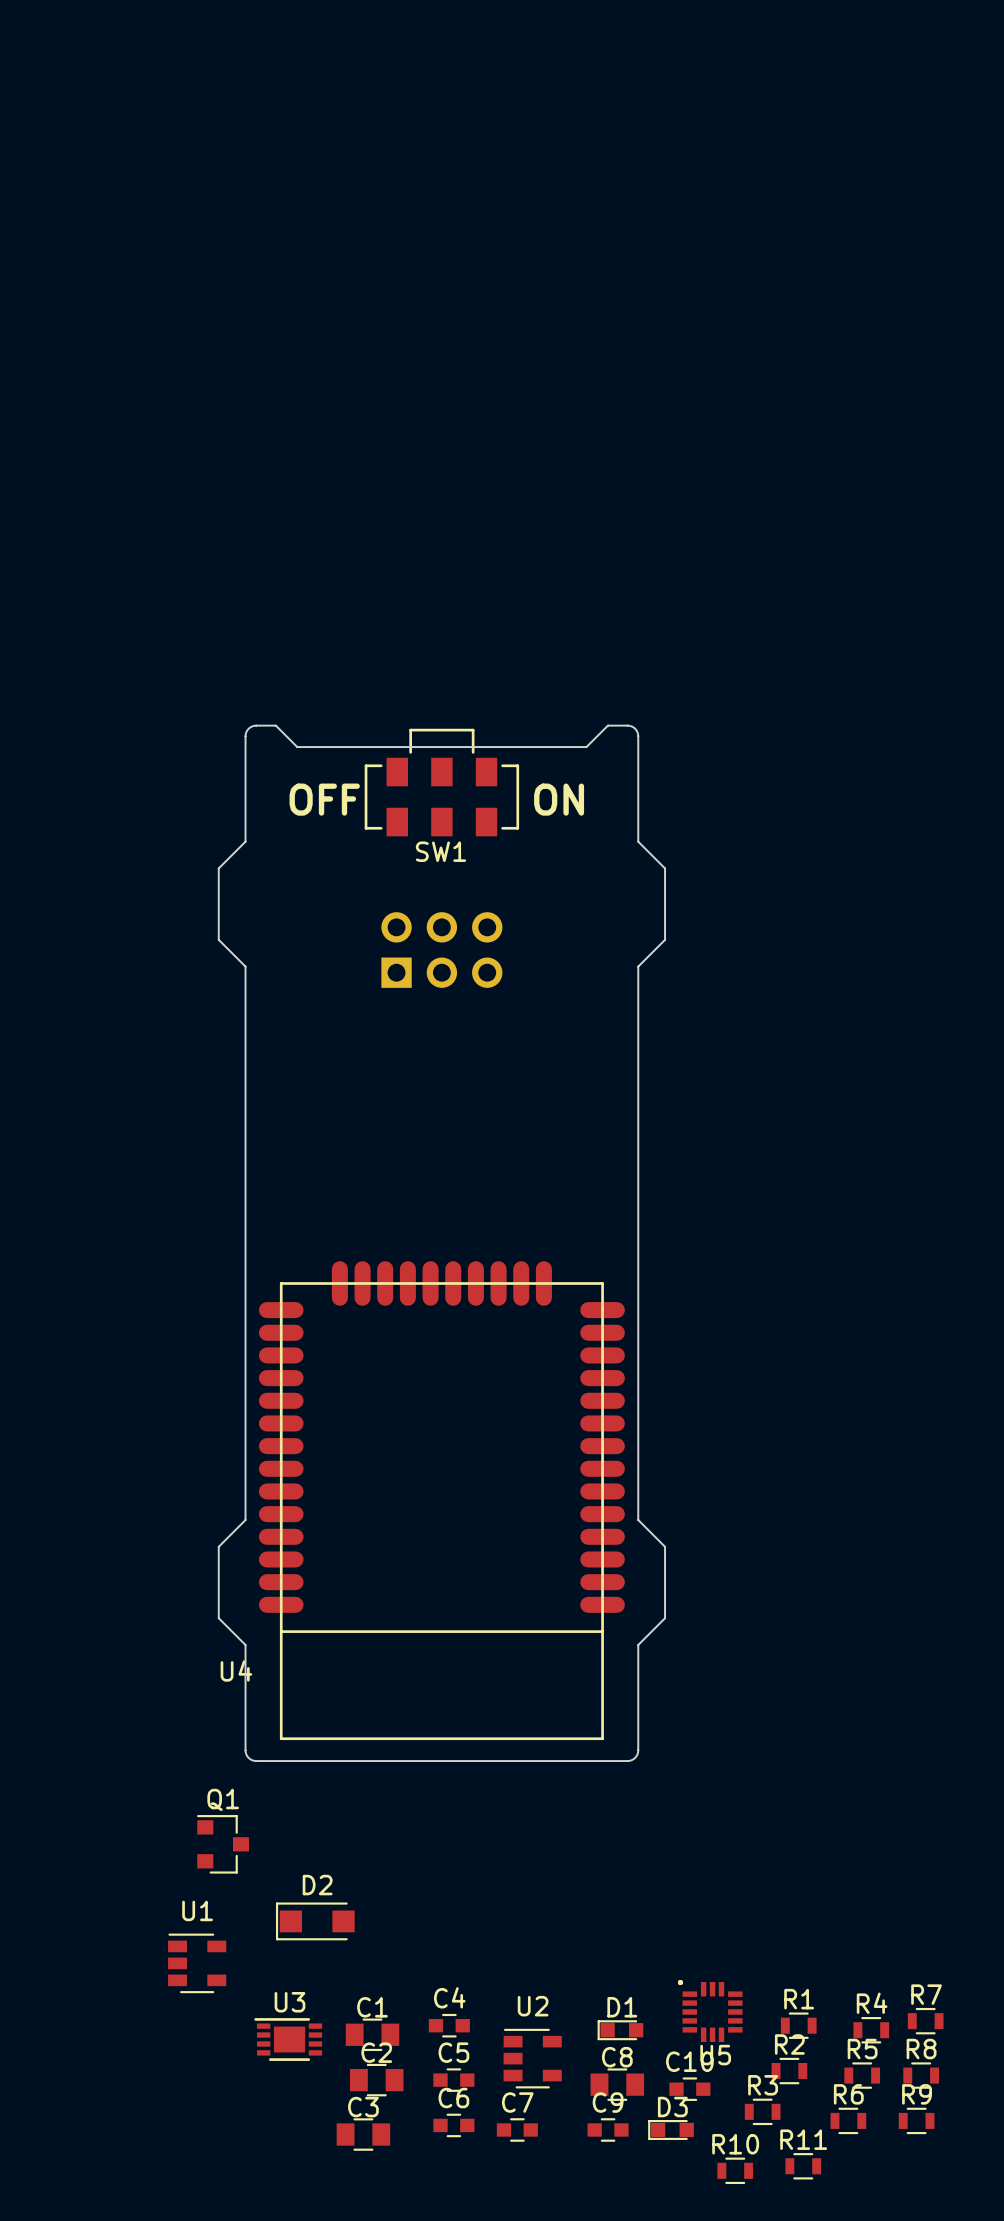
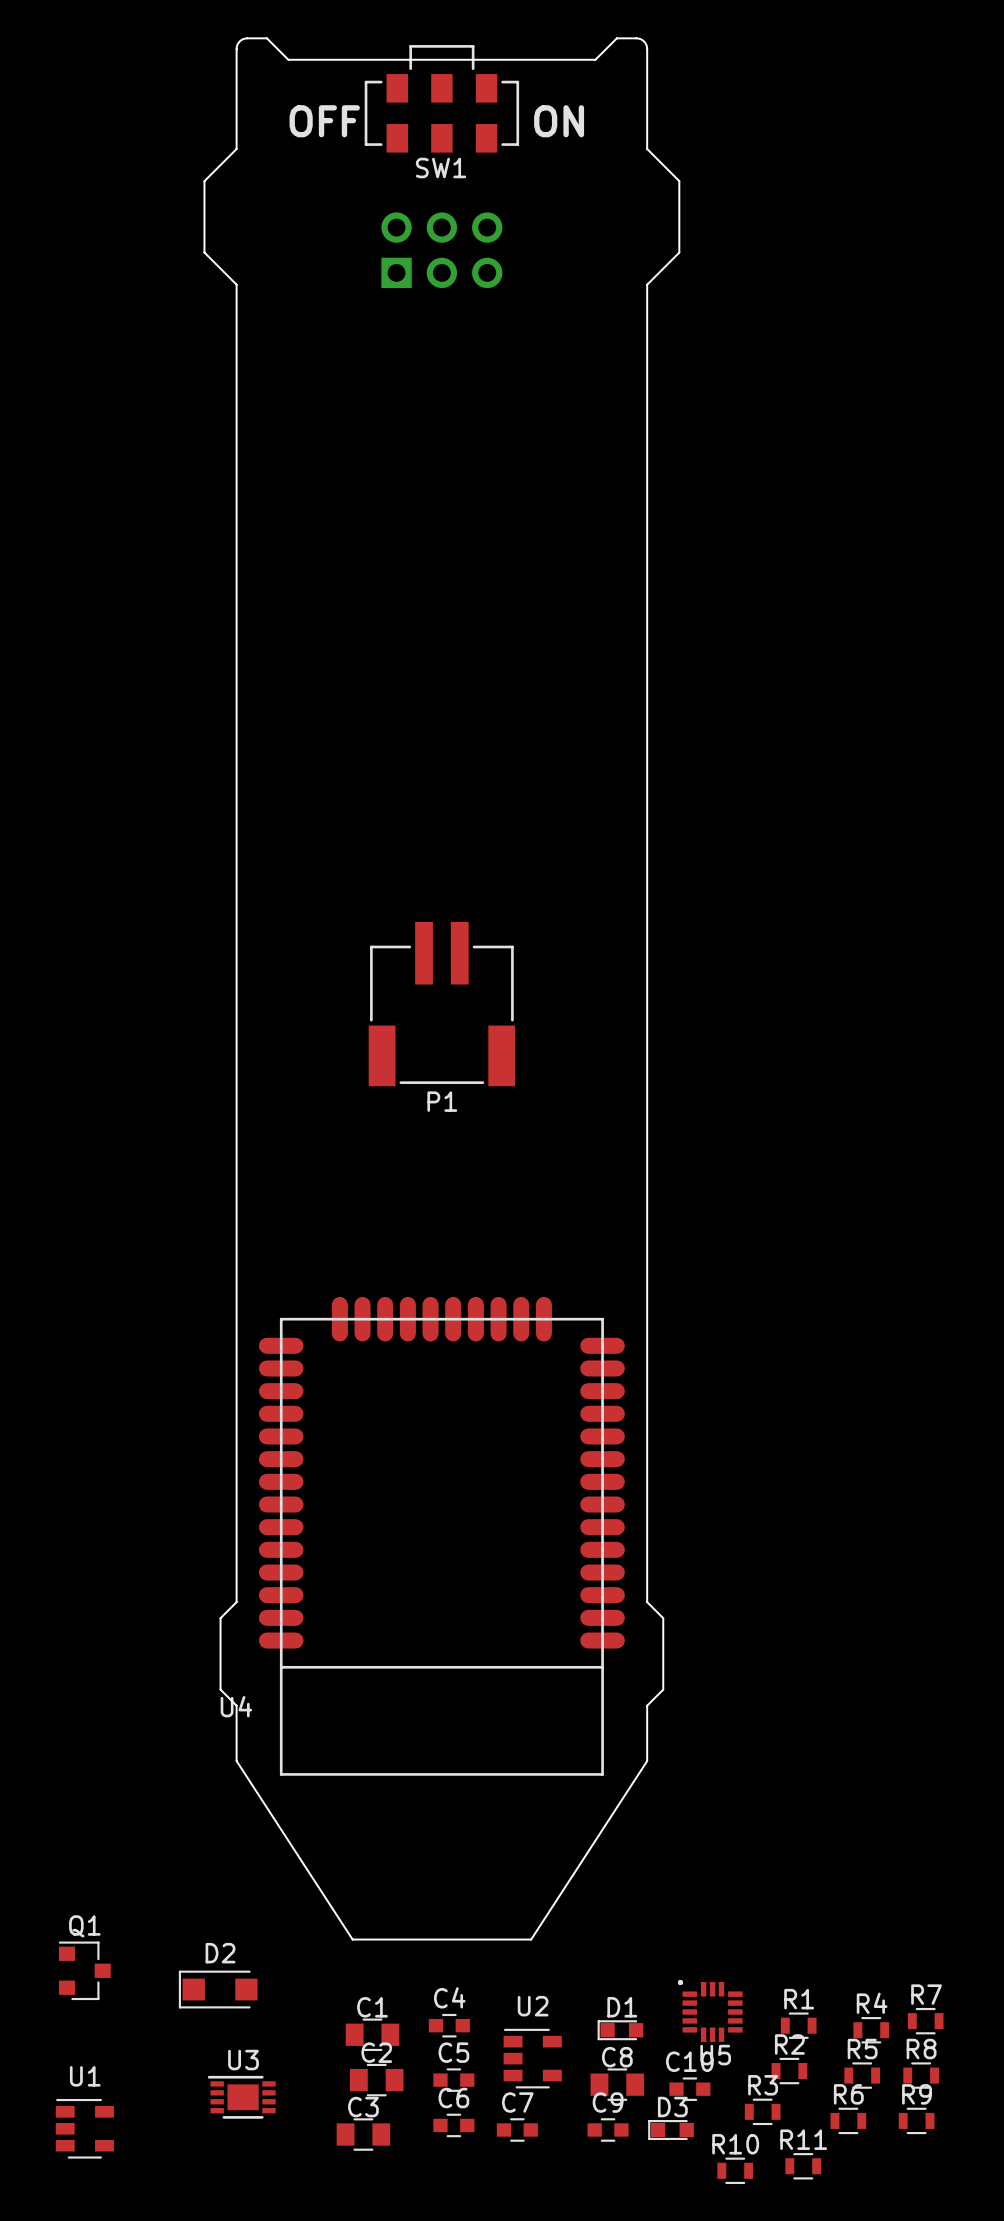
text: none -> OFF (324, 121)
text: none -> ON (559, 121)
part: none -> (441, 250)
board edge: (256, 725) (275, 725) (297, 747) (586, 747) (607, 725) (630, 726) (637, 732) (638, 841) (665, 868) (665, 939) (638, 966) (638, 1520) (665, 1546) (665, 1618) (638, 1644) (638, 1750) (636, 1756) (631, 1760) (256, 1761) (250, 1759) (246, 1754) (245, 1644) (218, 1618) (218, 1546) (245, 1520) (245, 966) (218, 939) (218, 868) (245, 841) (245, 734) (248, 728) (256, 725) -> (247, 38) (266, 38) (288, 59) (595, 59) (616, 38) (639, 38) (644, 42) (647, 47) (647, 149) (679, 181) (679, 252) (647, 284) (647, 1602) (663, 1618) (663, 1689) (647, 1705) (647, 1761) (531, 1939) (352, 1939) (236, 1761) (236, 1705) (220, 1689) (220, 1618) (236, 1602) (236, 284) (204, 252) (204, 181) (236, 149) (236, 47) (240, 40) (247, 38)
SW1 position: (441, 782) -> (441, 98)
text: OFF (324, 799) -> none
text: ON (559, 799) -> none
part: (441, 950) -> none
P1: none -> (441, 1004)
U4 position: (441, 1500) -> (441, 1536)
Q1 position: (223, 1844) -> (84, 1970)
D2 position: (315, 1921) -> (218, 1989)
U1 position: (197, 1963) -> (84, 2128)
U3 position: (288, 2039) -> (241, 2097)

